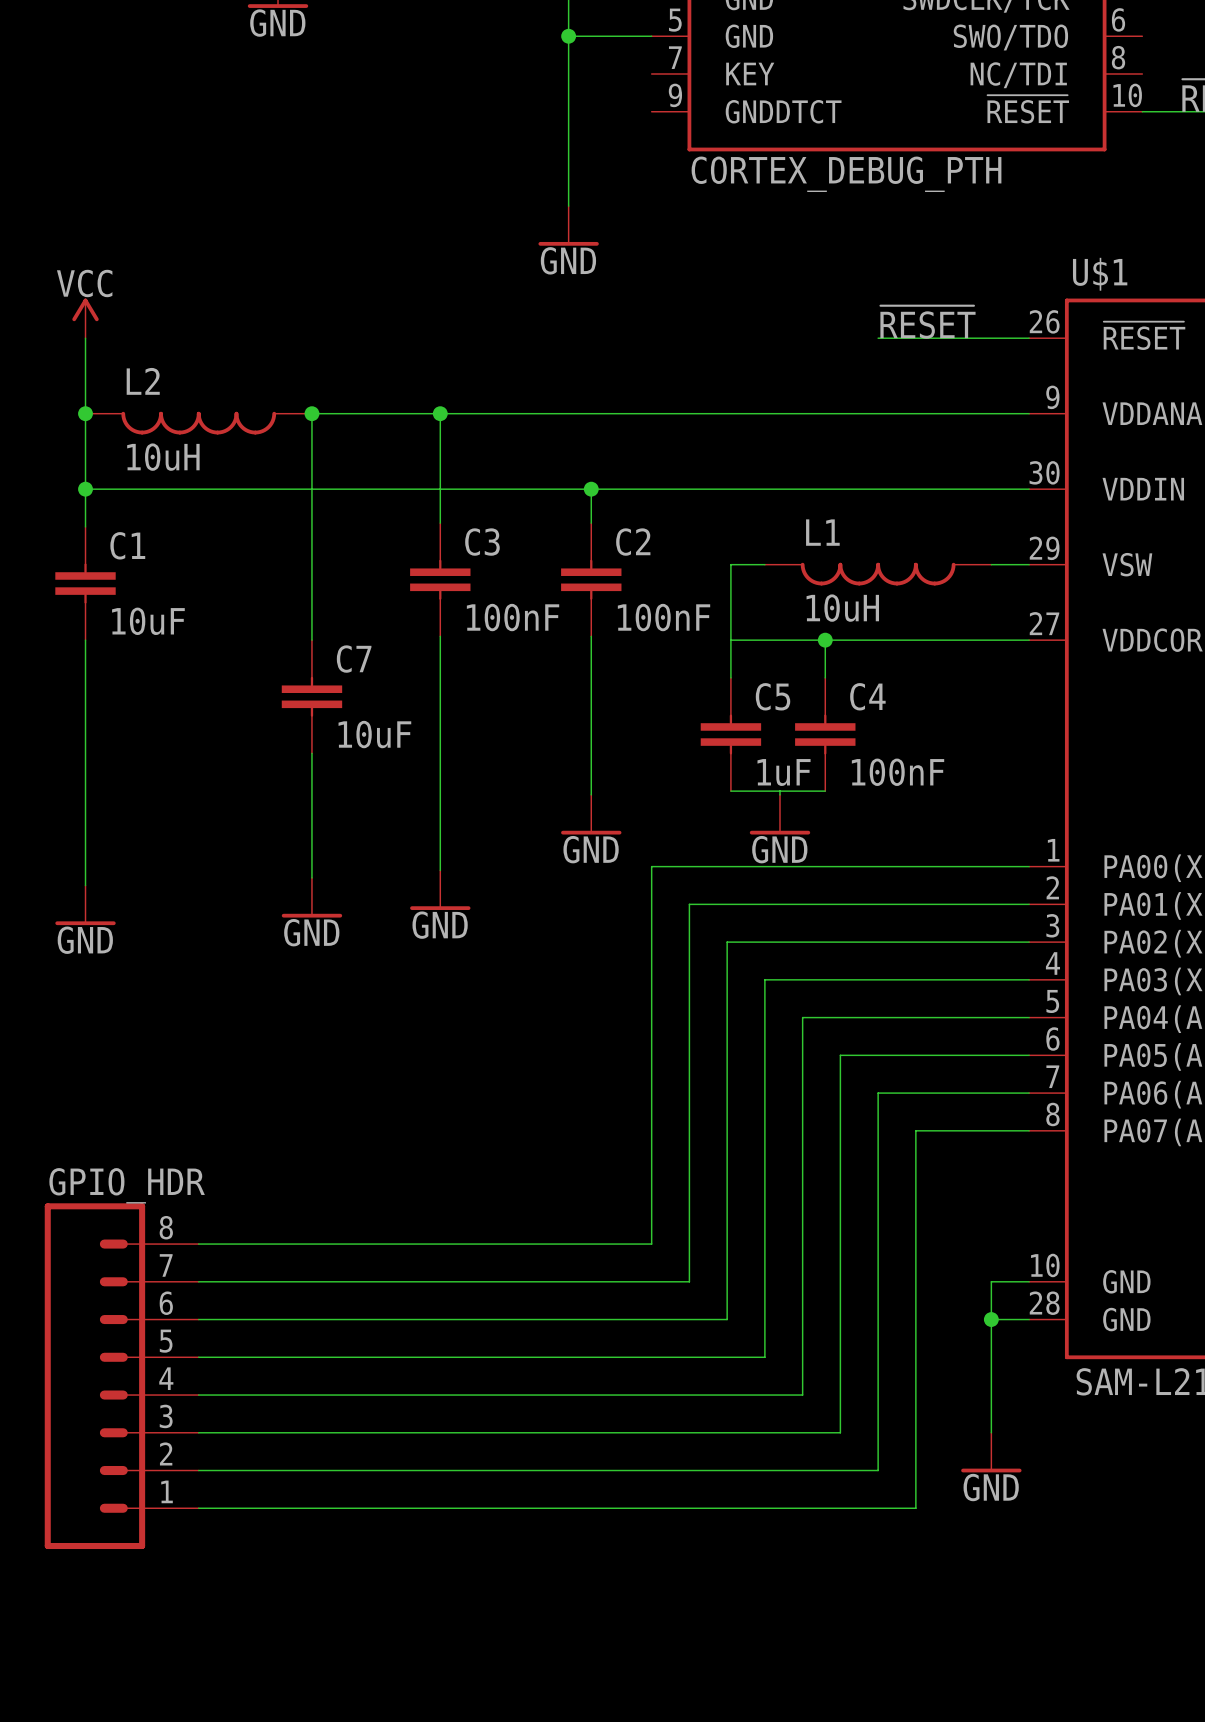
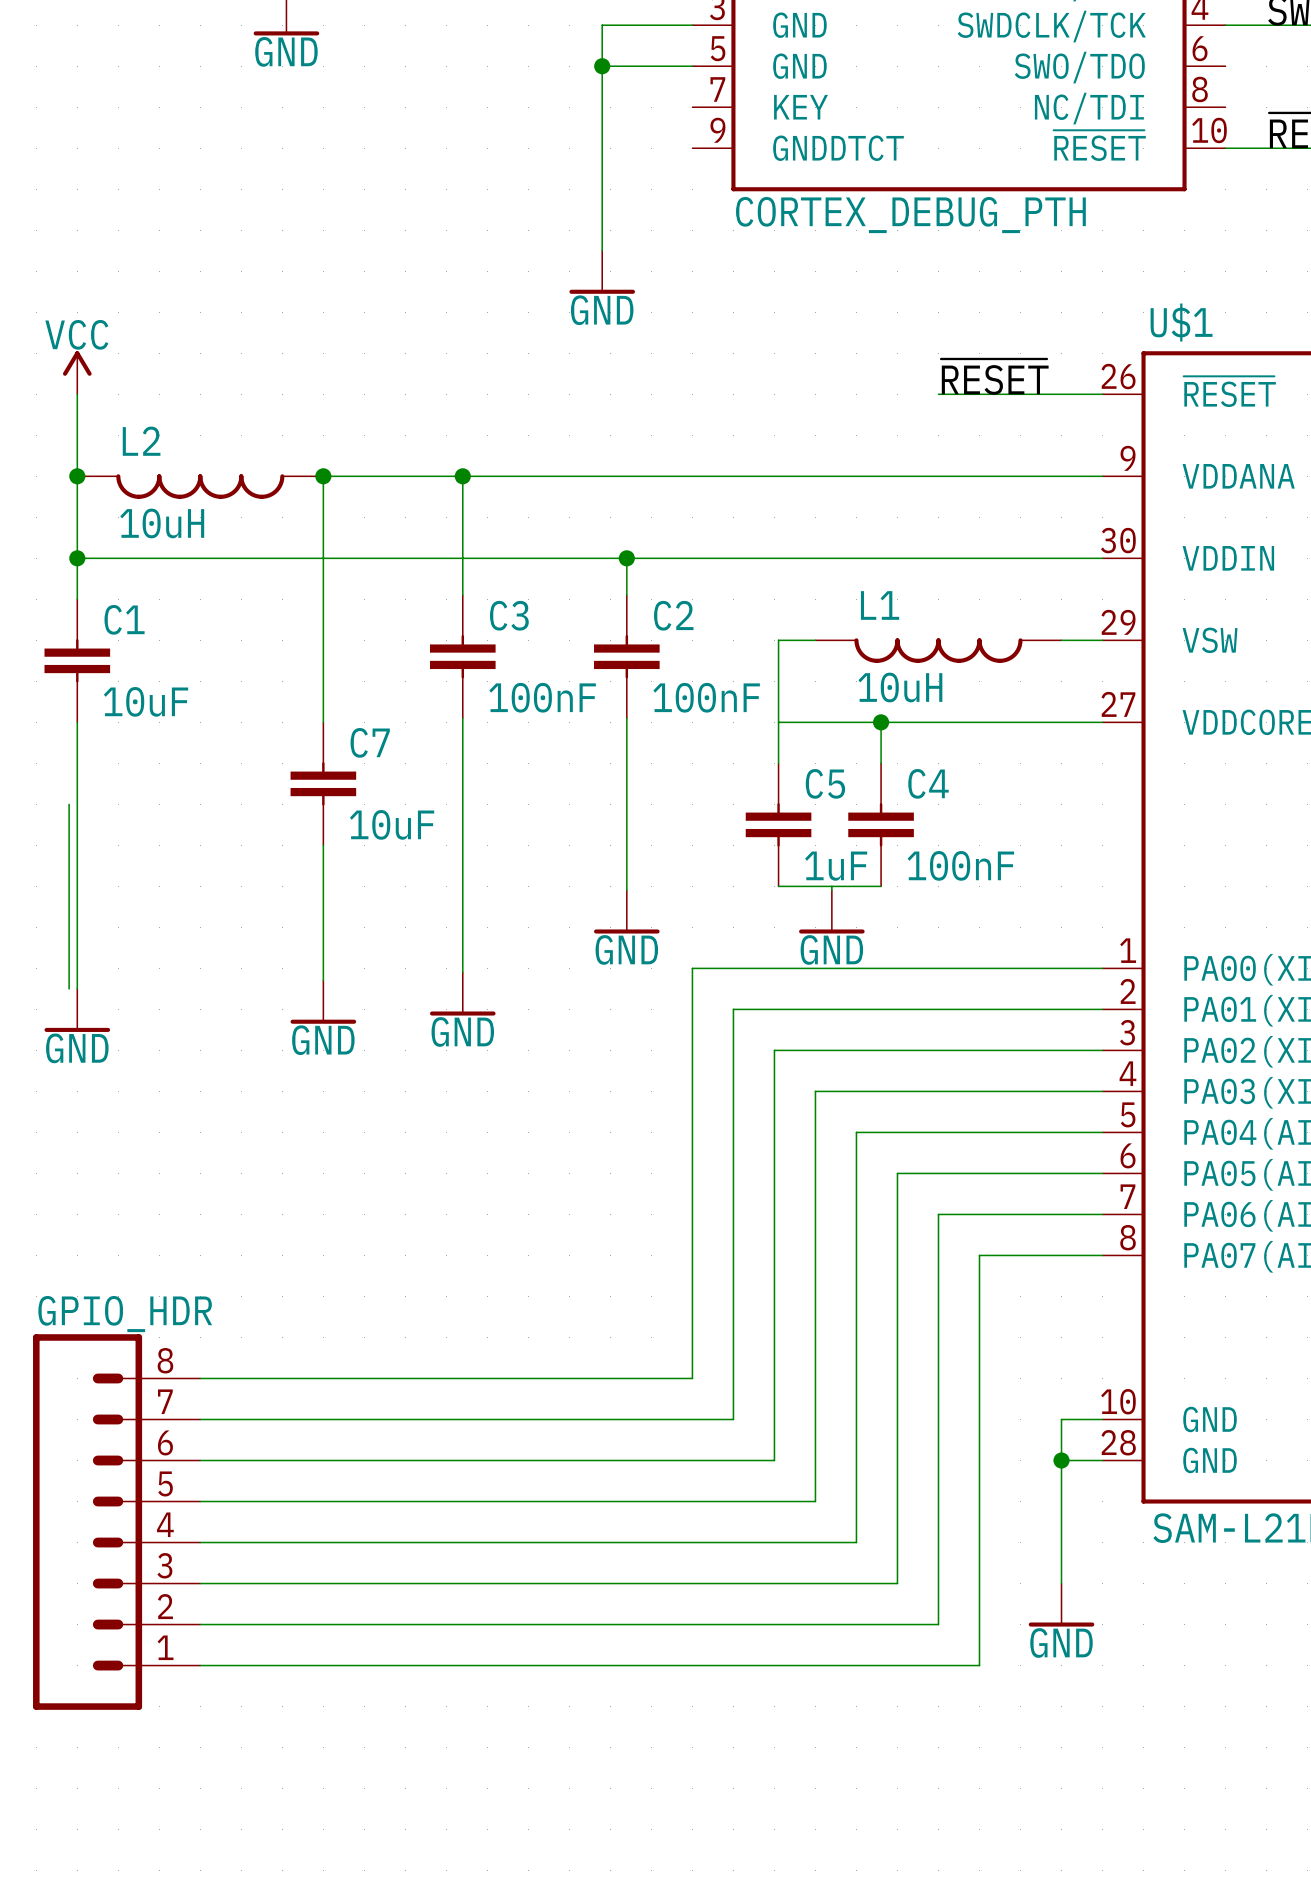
wire: none -> (69, 804) (69, 988)

